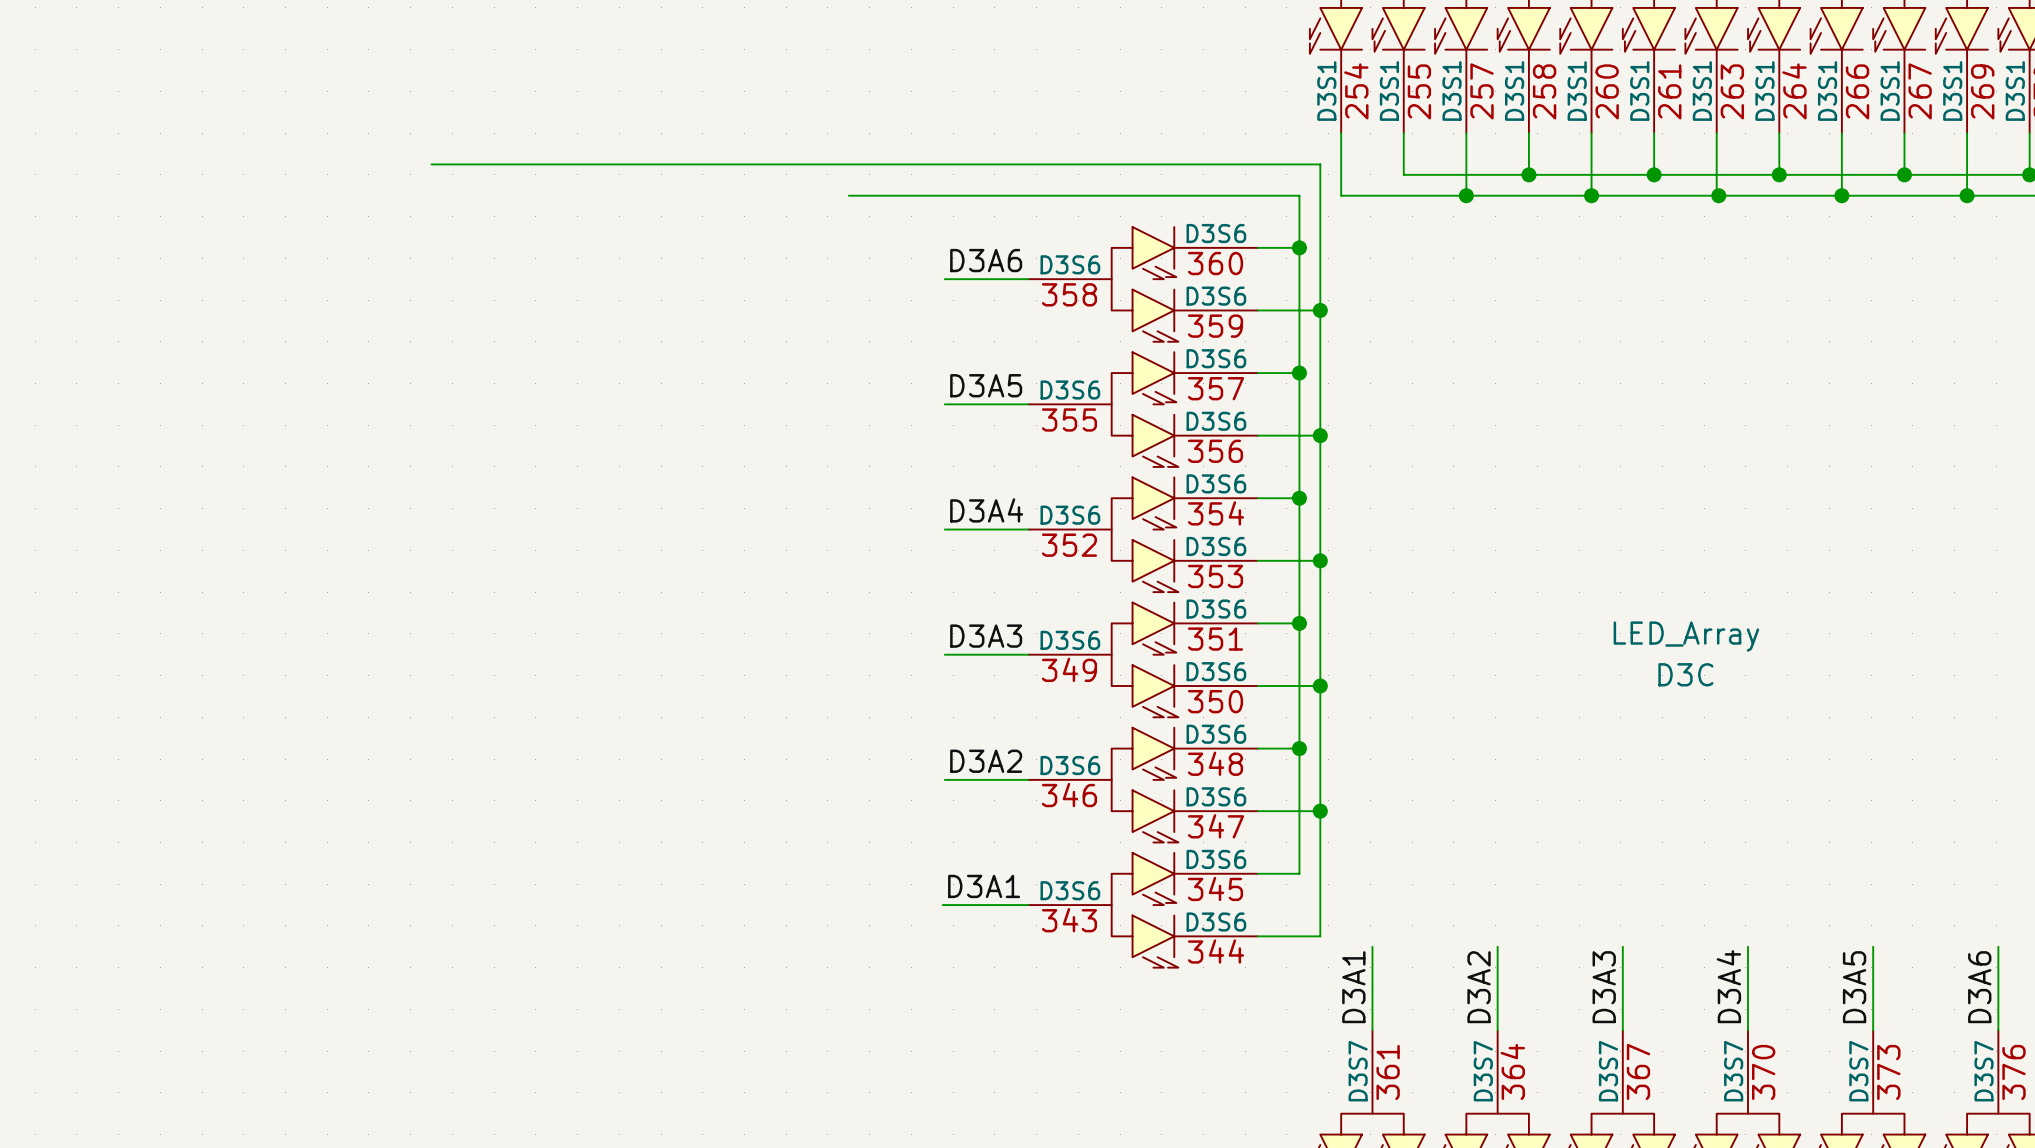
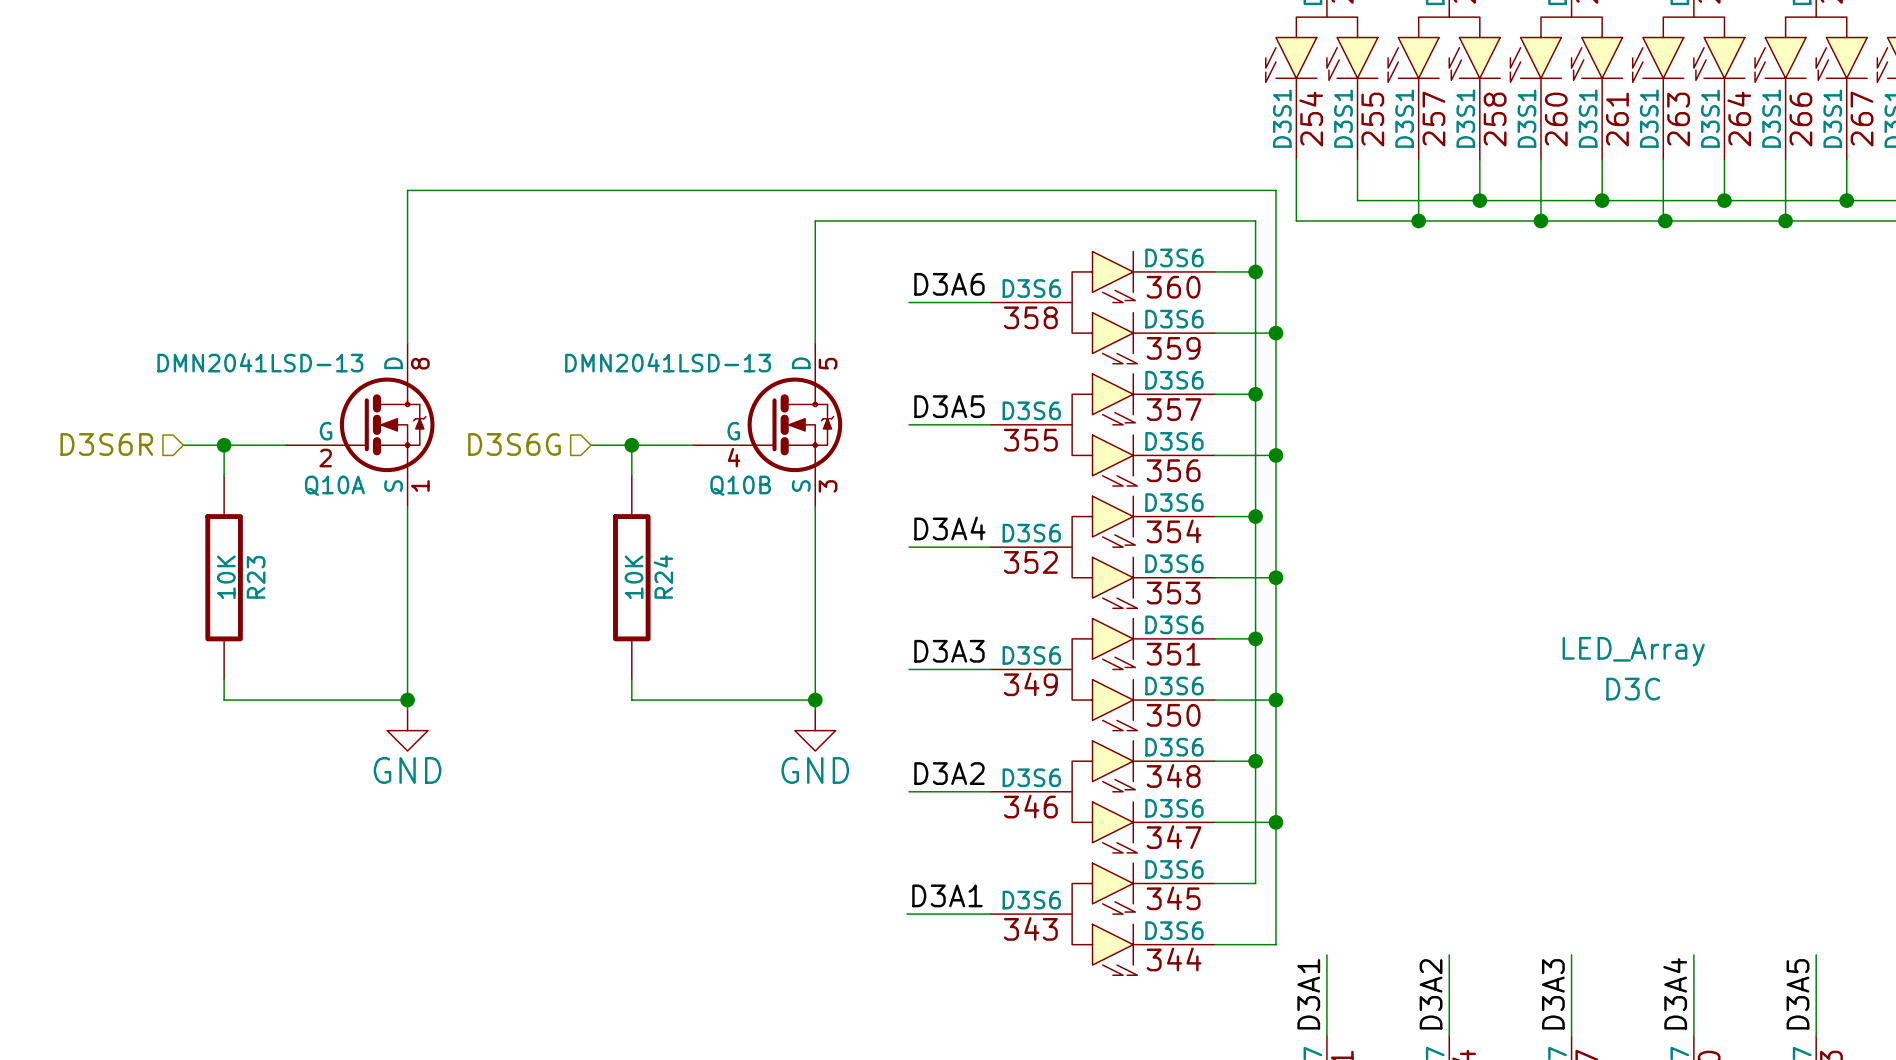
wire: none -> (407, 190) (407, 343)
wire: none -> (815, 220) (815, 343)
Q10A: none -> DMN2041LSD-13 (359, 424)
Q10B: none -> DMN2041LSD-13 (767, 424)
hierarchical label: none -> D3S6R (106, 444)
hierarchical label: none -> D3S6G (514, 444)
wire: none -> (183, 445) (285, 445)
wire: none -> (224, 445) (224, 475)
junction: none -> (224, 445)
wire: none -> (591, 445) (692, 445)
wire: none -> (631, 445) (631, 475)
junction: none -> (631, 445)
wire: none -> (407, 506) (407, 710)
wire: none -> (815, 506) (815, 710)
R23: none -> 10K (224, 577)
R24: none -> 10K (631, 577)
wire: none -> (224, 679) (224, 700) (407, 700)
wire: none -> (631, 679) (631, 700) (815, 700)
junction: none -> (407, 700)
junction: none -> (815, 700)
power symbol: none -> GND (407, 730)
power symbol: none -> GND (815, 730)

